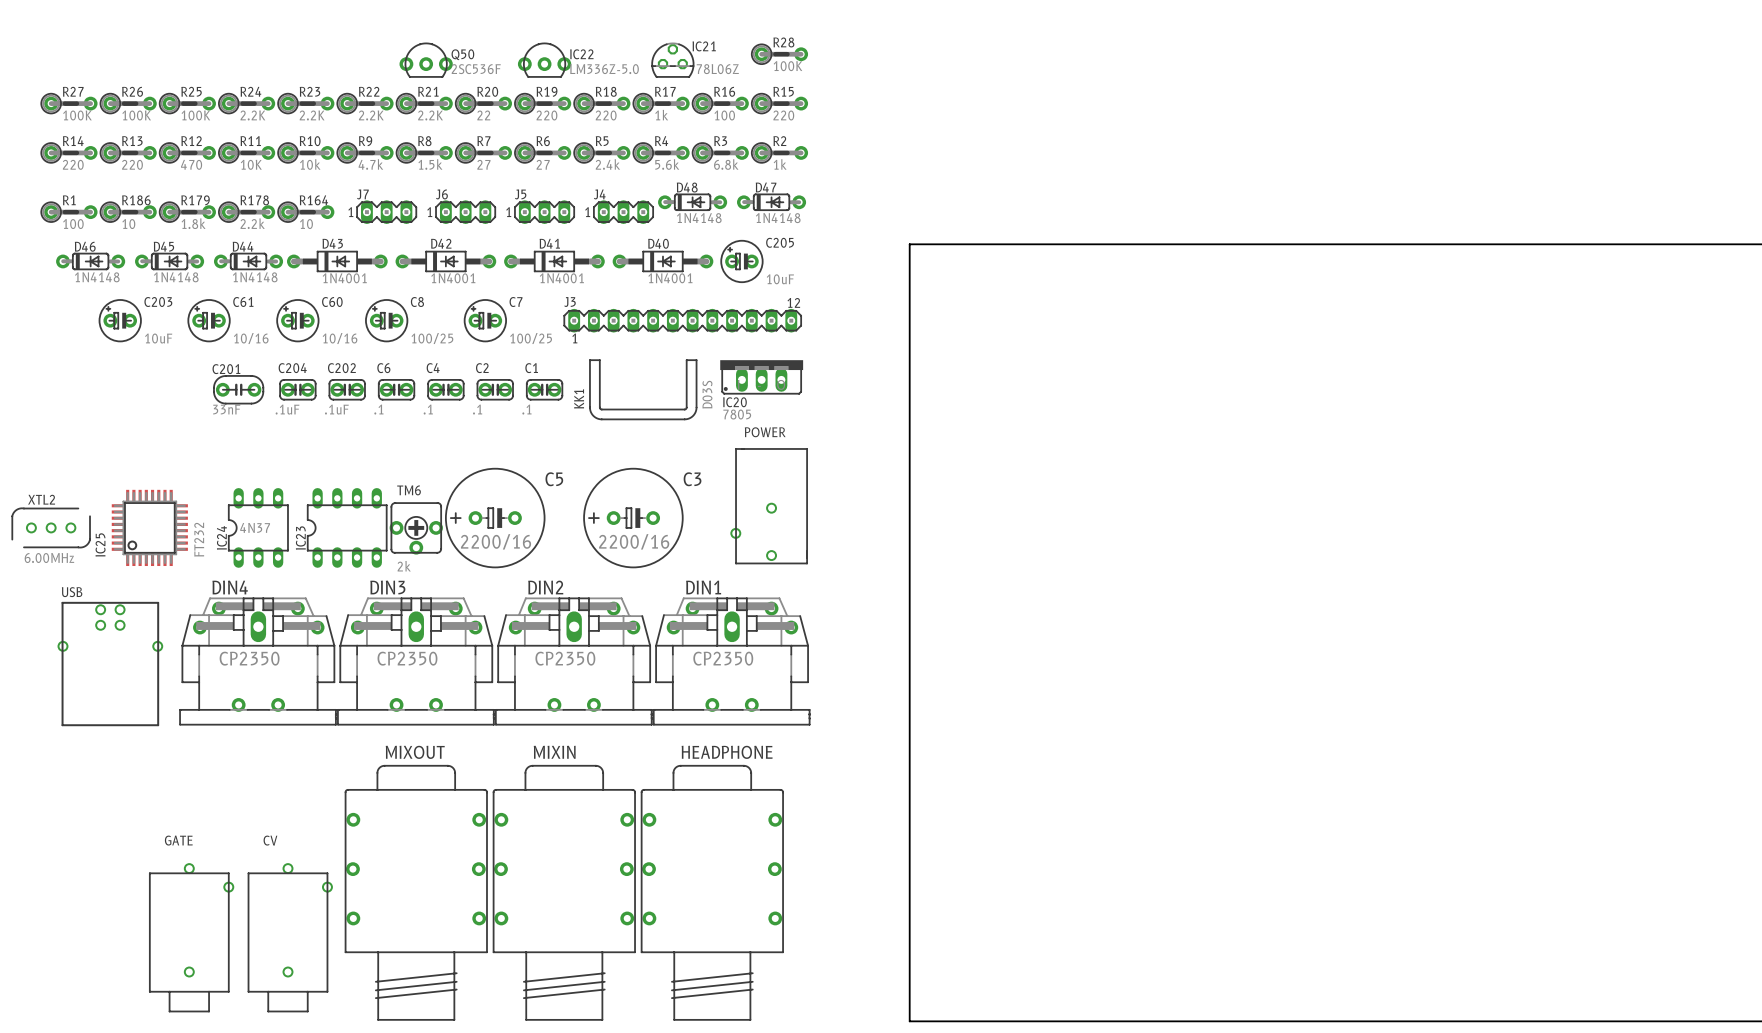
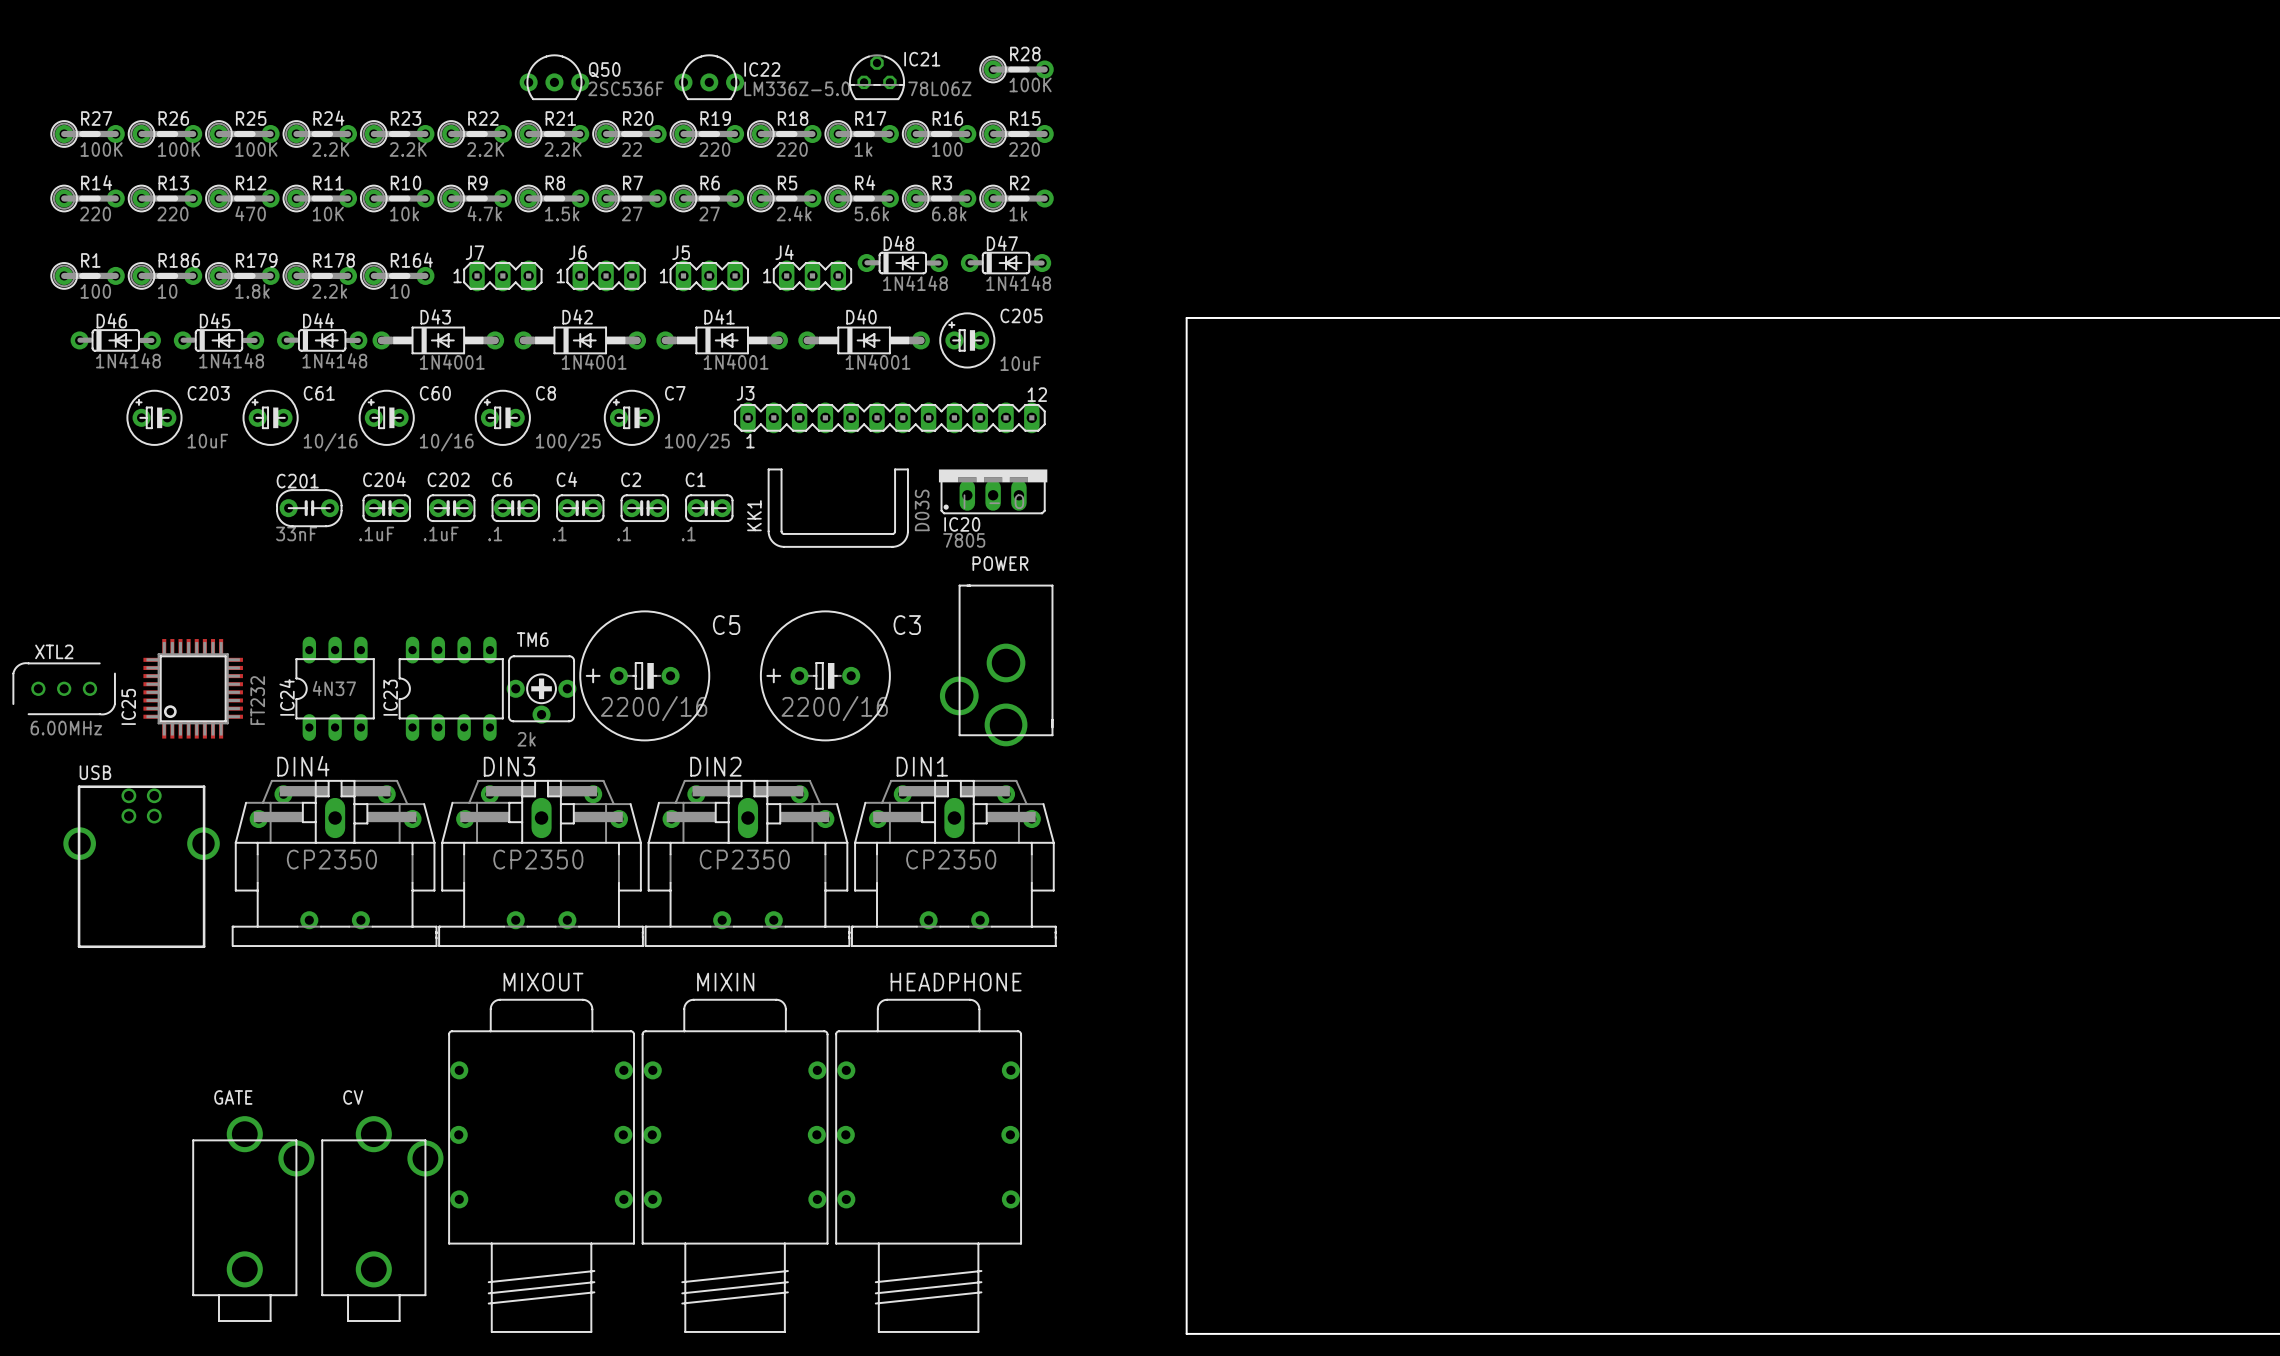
POWER footprint: [730, 448, 808, 564] -> [939, 584, 1054, 747]
USB footprint: [57, 601, 164, 727] -> [63, 785, 220, 949]
GATE footprint: [149, 863, 235, 1012] -> [192, 1116, 315, 1322]
CV footprint: [248, 863, 333, 1012] -> [321, 1116, 444, 1322]

